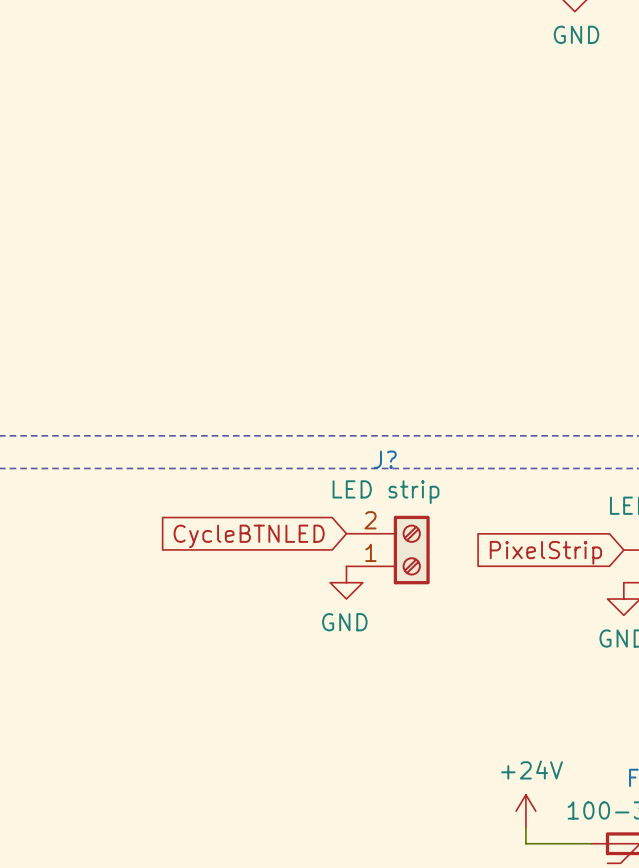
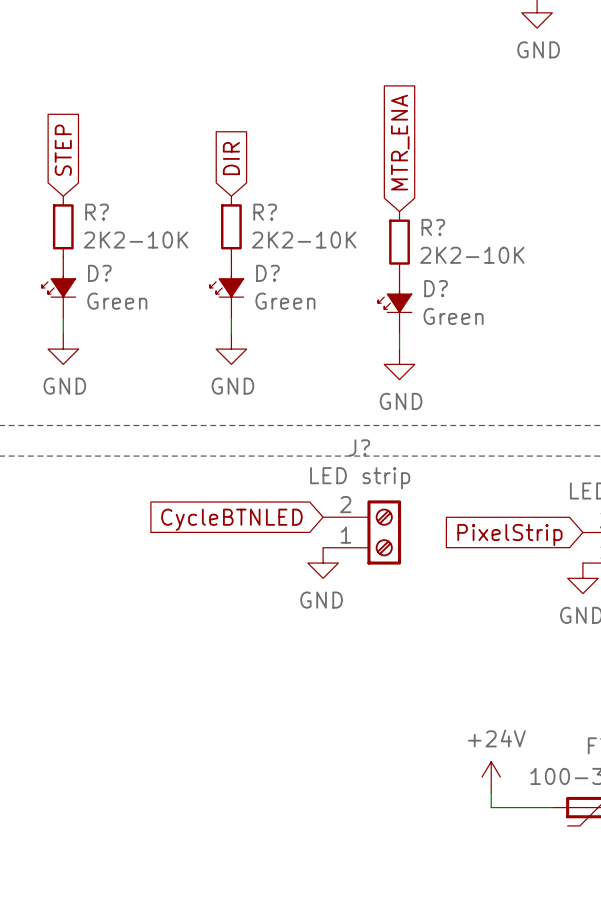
global label: none -> MTR_ENA (400, 142)
global label: none -> STEP (63, 150)
global label: none -> DIR (231, 158)
R?: none -> 2K2-10K (63, 226)
R?: none -> 2K2-10K (231, 226)
R?: none -> 2K2-10K (399, 242)
D?: none -> Green (58, 287)
D?: none -> Green (226, 287)
D?: none -> Green (394, 303)
wire: none -> (63, 318) (63, 333)
wire: none -> (231, 318) (231, 333)
wire: none -> (399, 333) (399, 349)
power symbol: none -> GND (63, 349)
power symbol: none -> GND (231, 349)
power symbol: none -> GND (399, 364)

